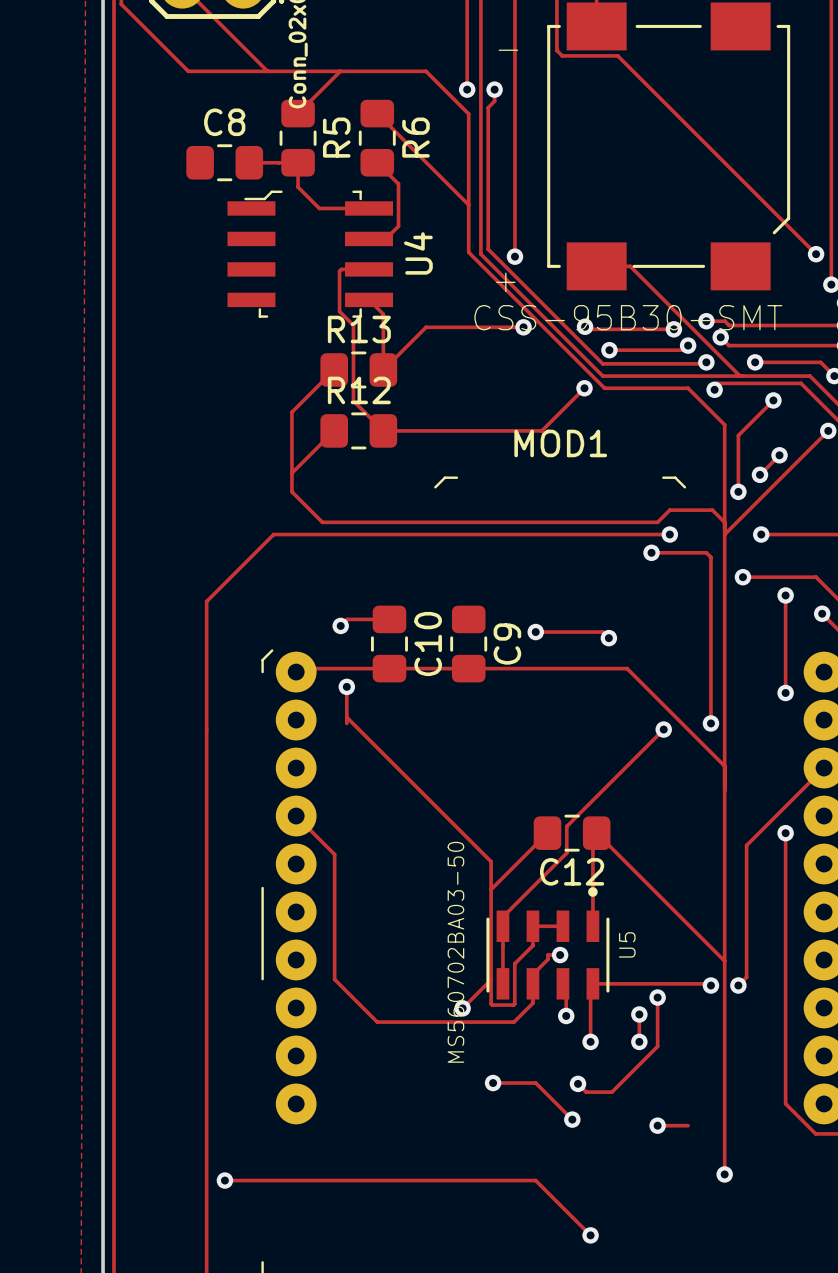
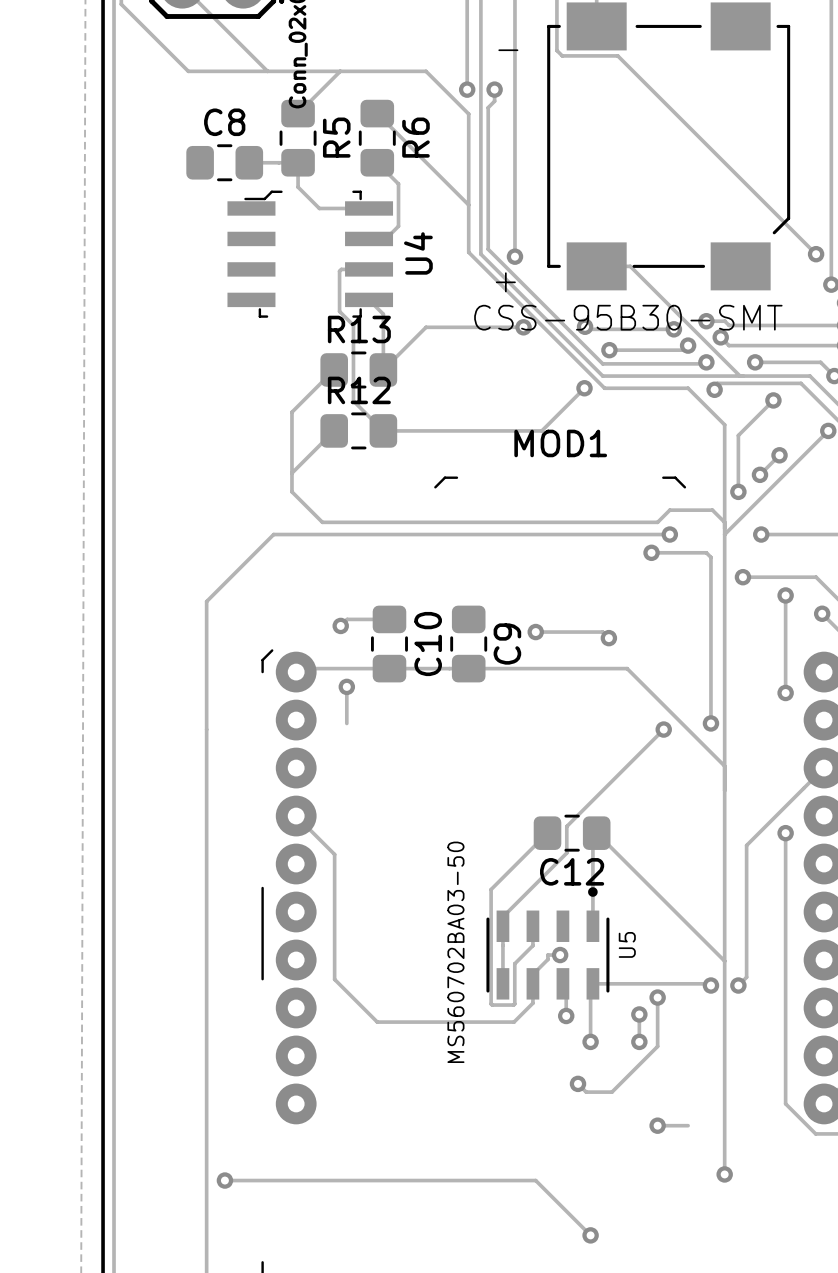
track: (346, 717) (491, 861) (491, 889) -> none
track: (532, 926) (562, 926) -> none
track: (491, 979) (462, 1008) -> none
via: (462, 1008) -> none
track: (493, 1083) (535, 1083) (572, 1119) -> none
via: (493, 1083) -> none
via: (572, 1119) -> none

